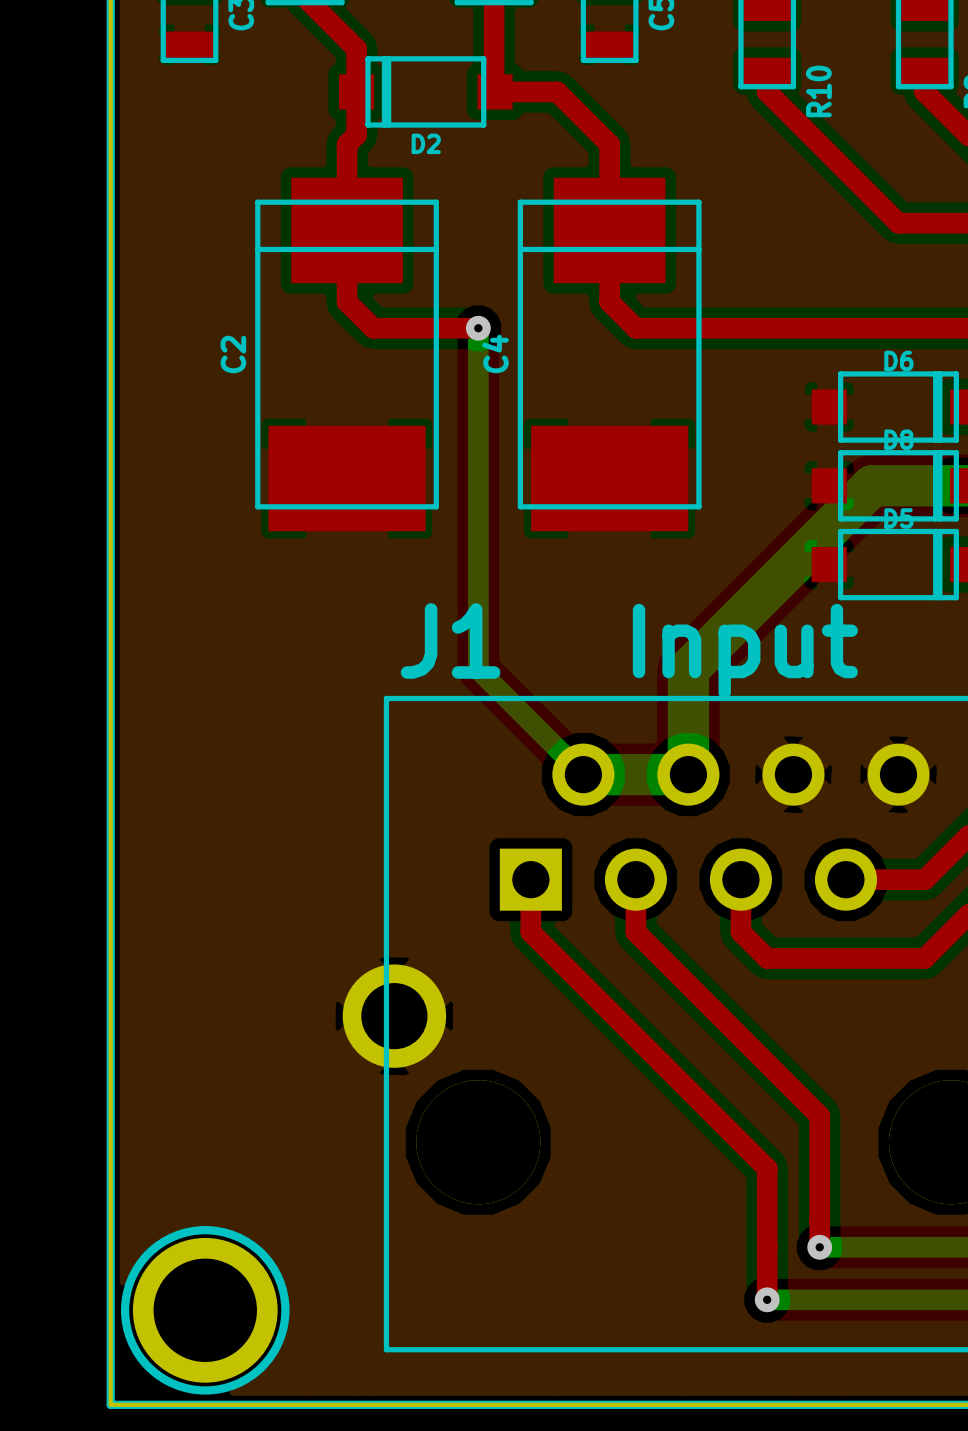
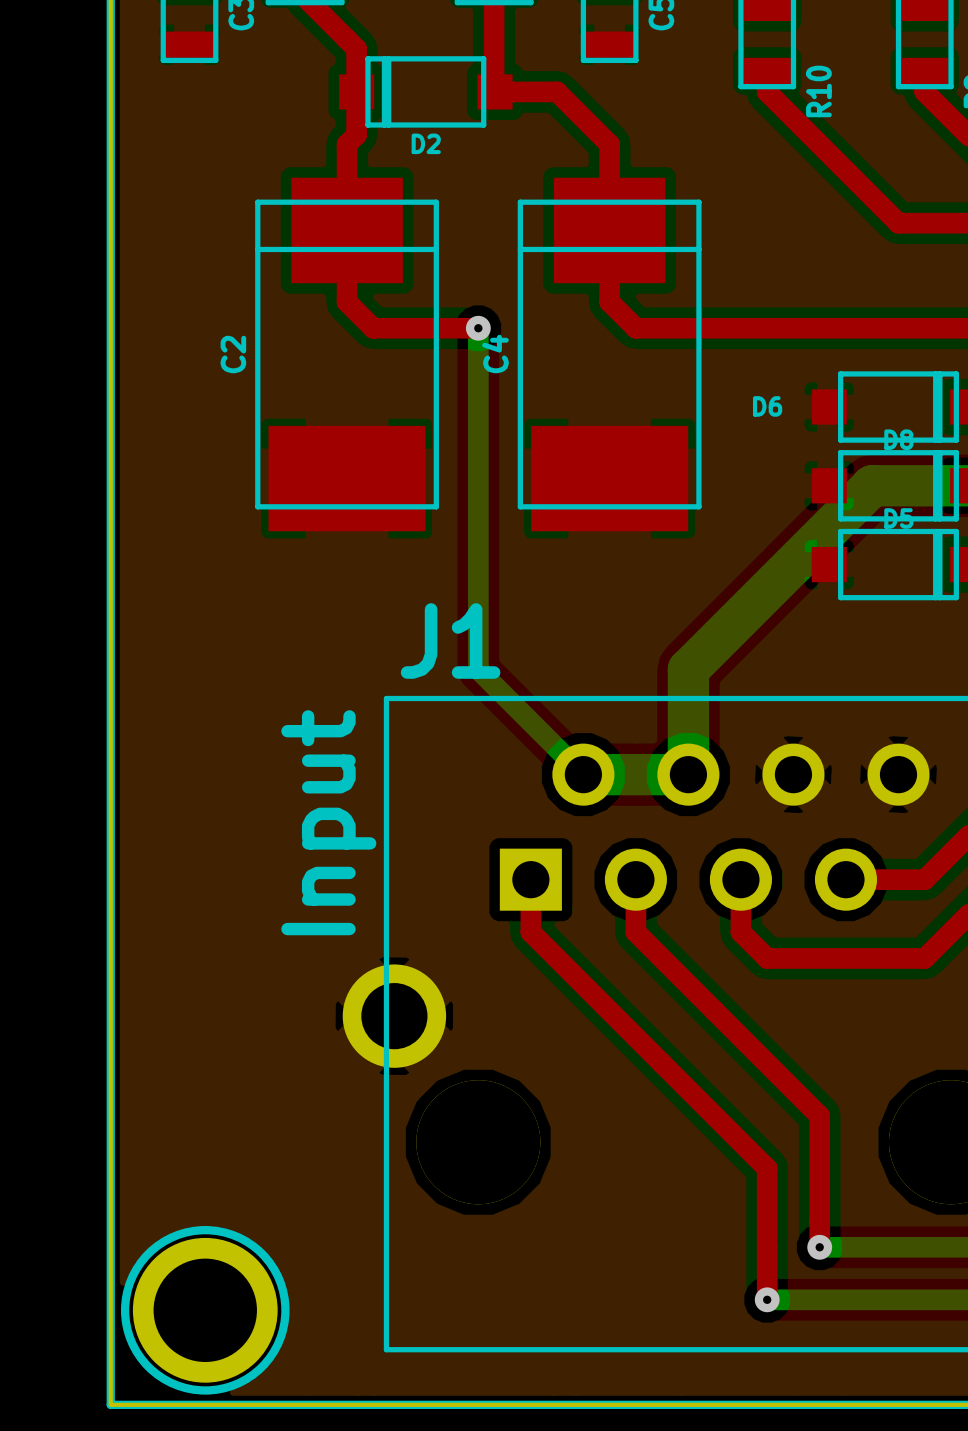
D6 name position: D6 (898, 360) -> D6 (767, 406)
text rotation: 0° (745, 651) -> 90° counterclockwise (328, 822)
text position: Input (745, 651) -> Input (328, 822)

